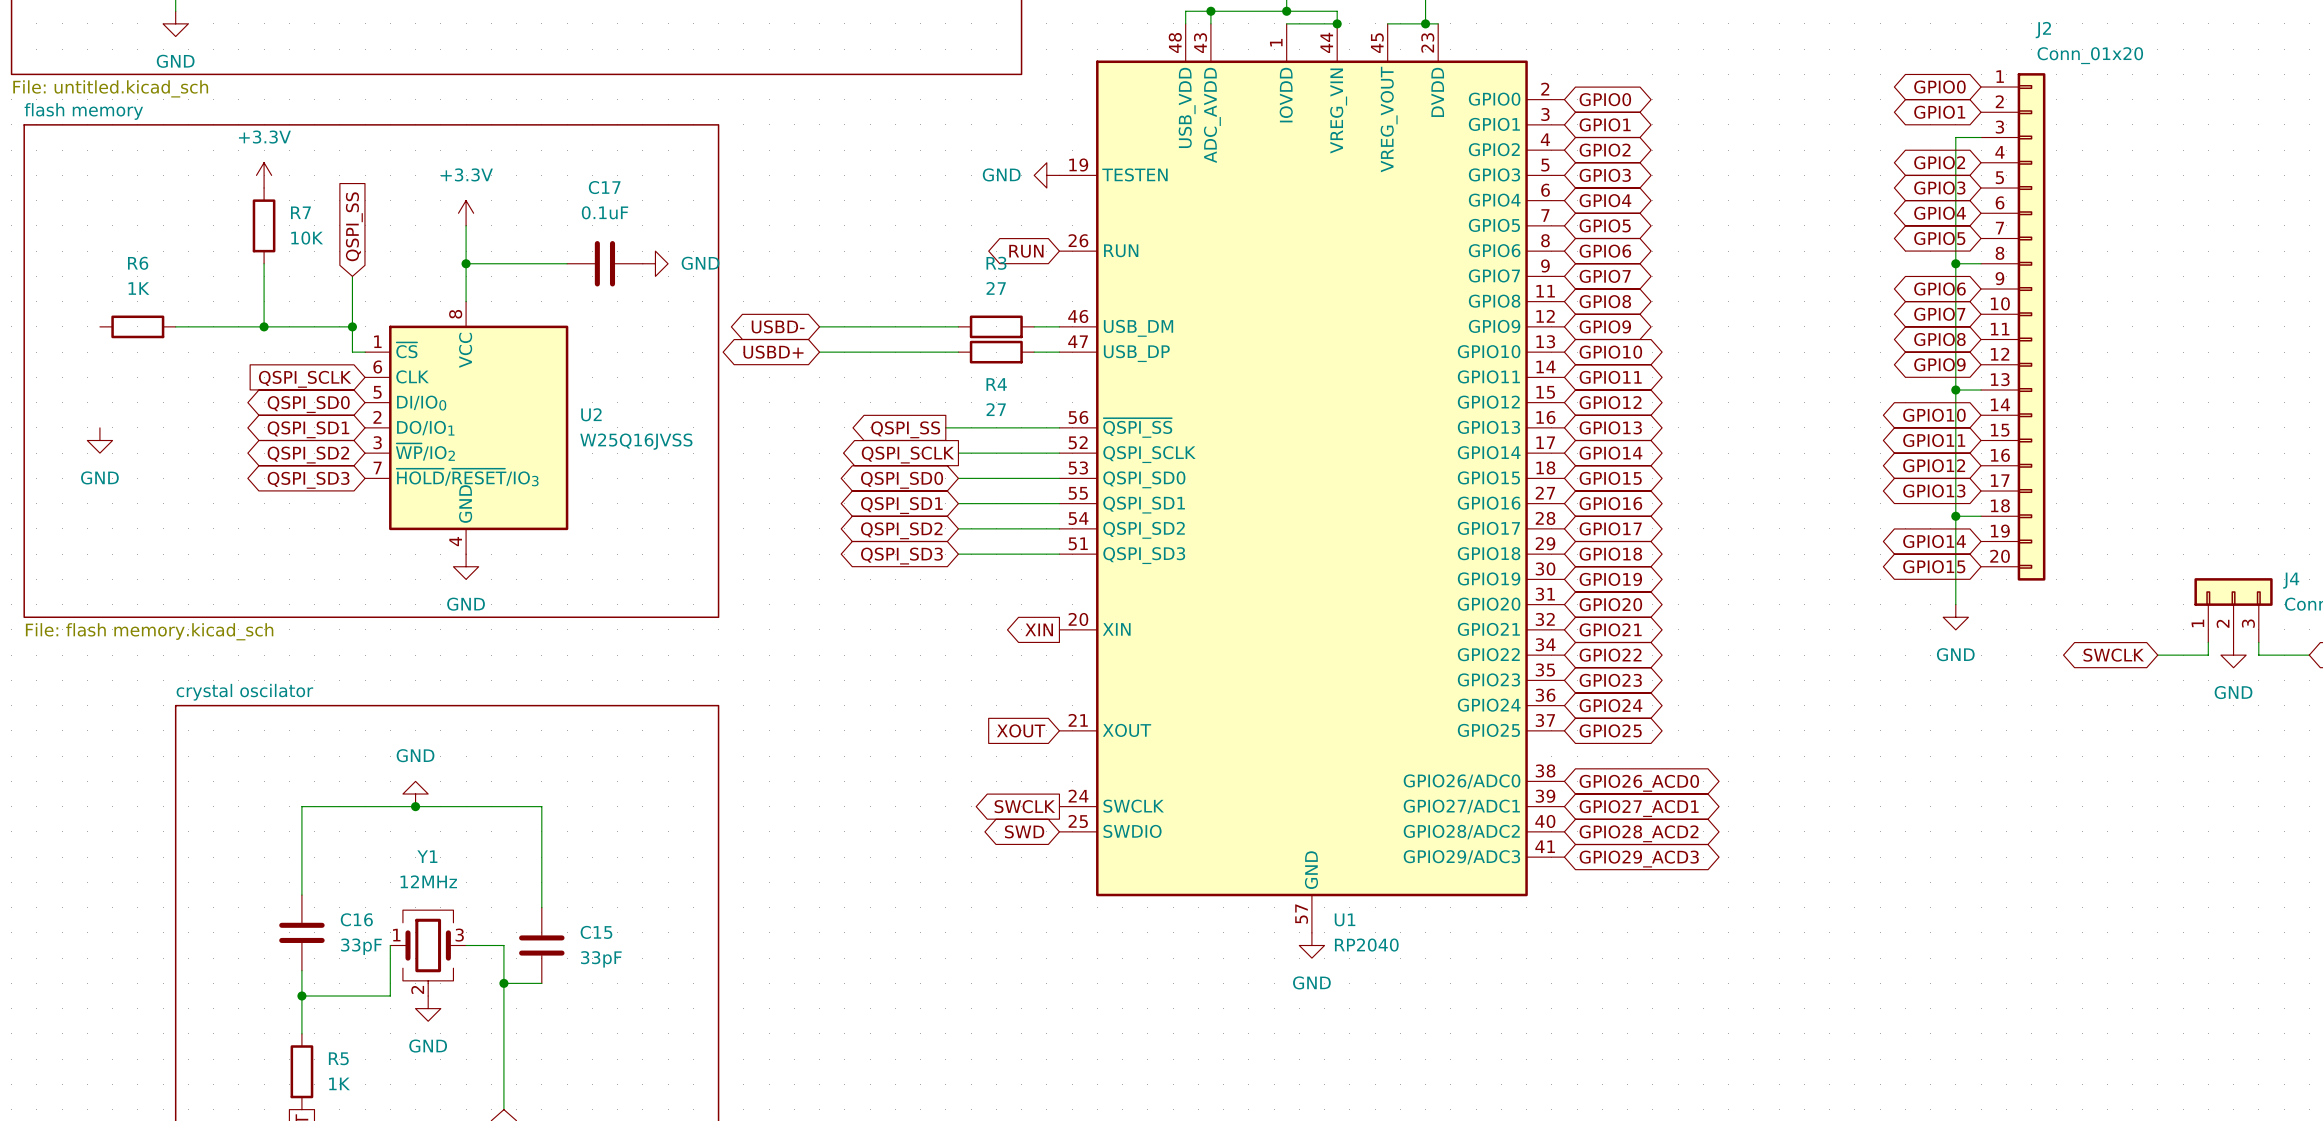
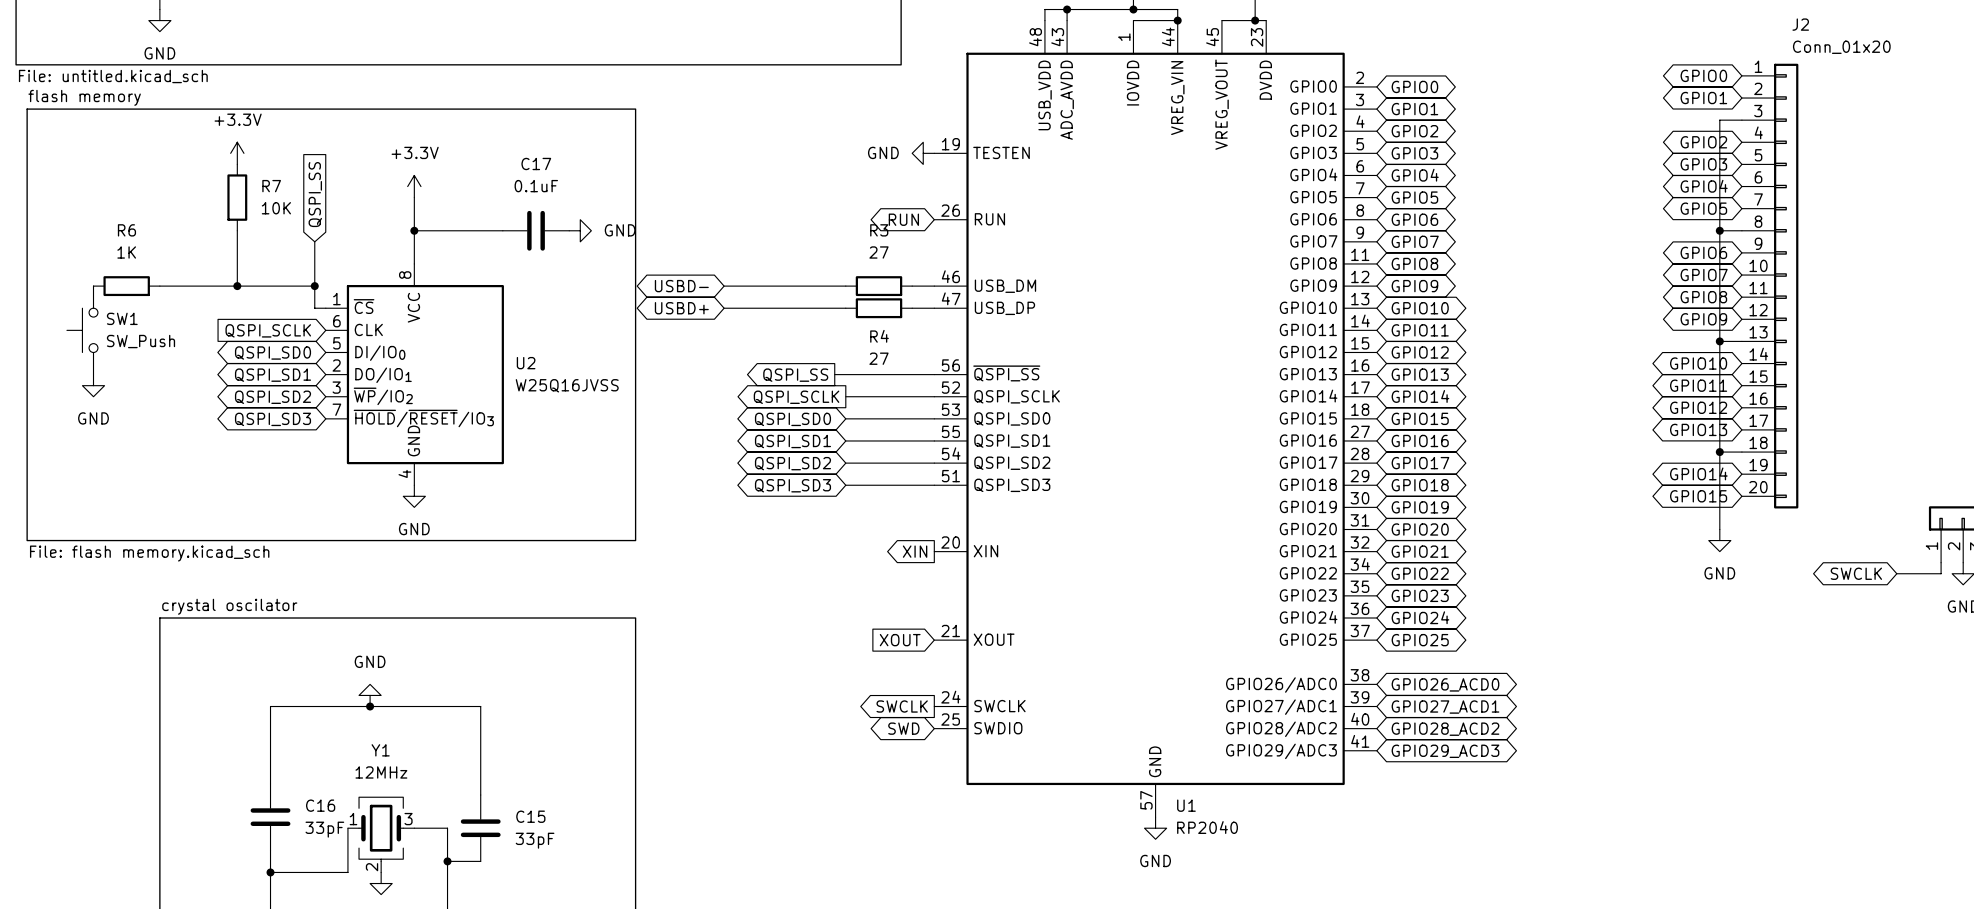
SW1: none -> SW_Push (82, 330)

